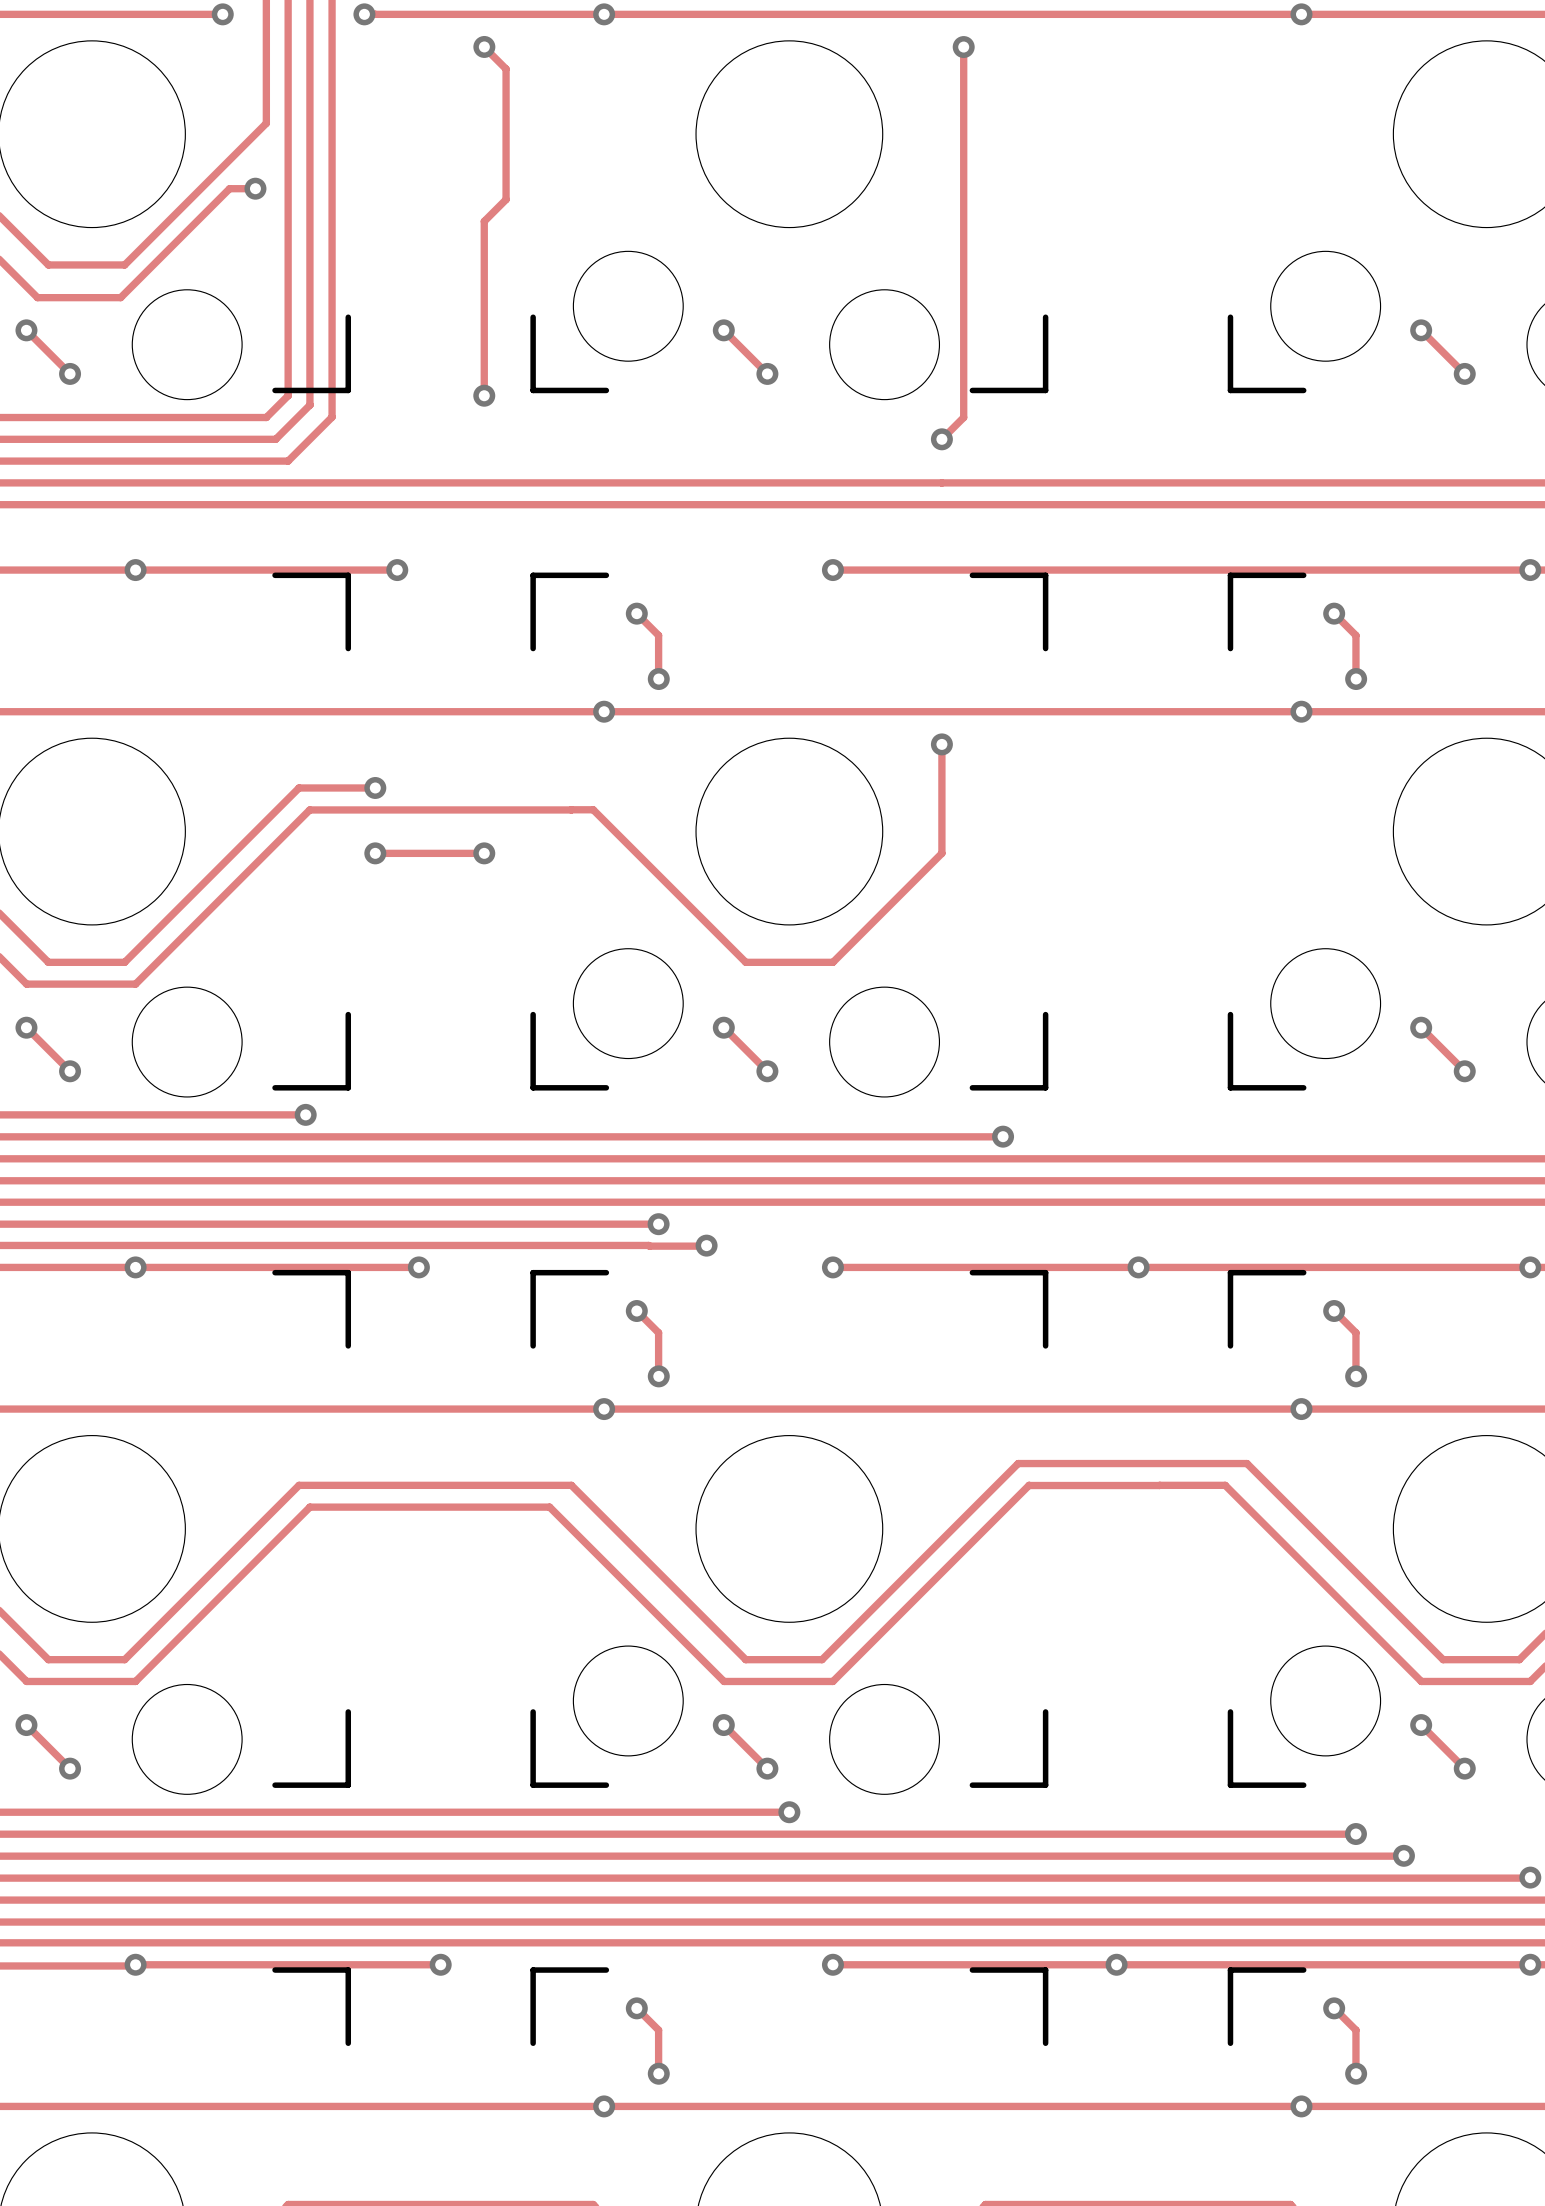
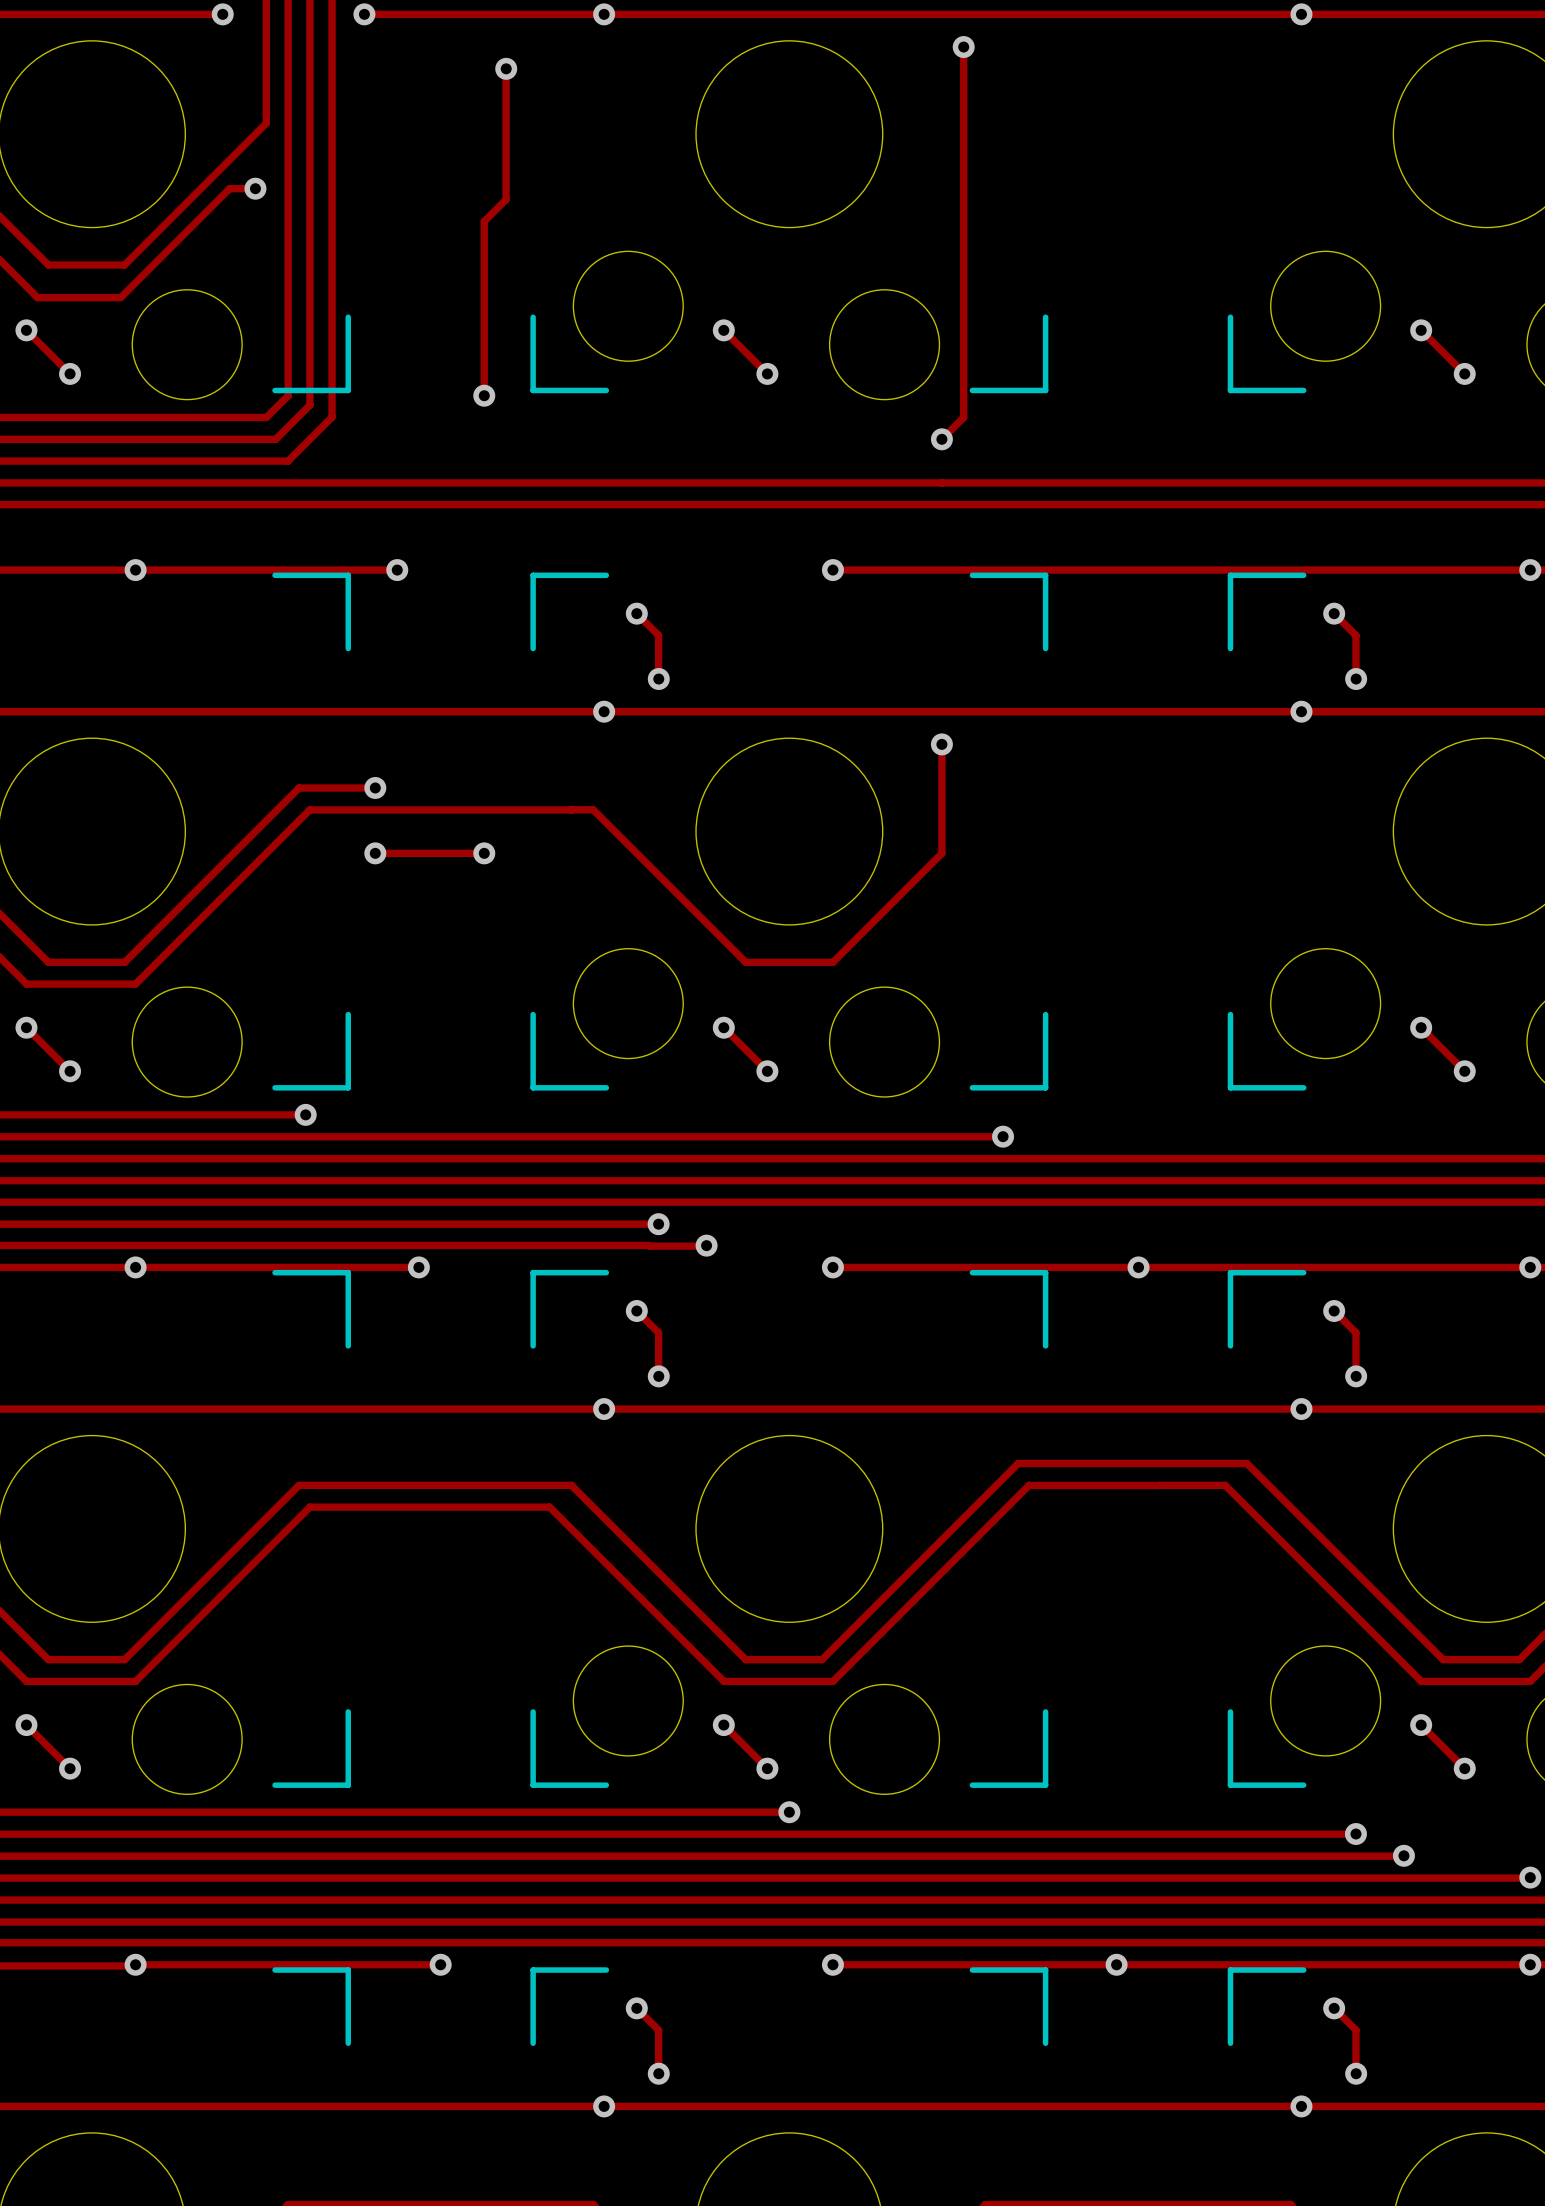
via position: (484, 46) -> (506, 68)
track: (484, 47) (506, 69) -> none

